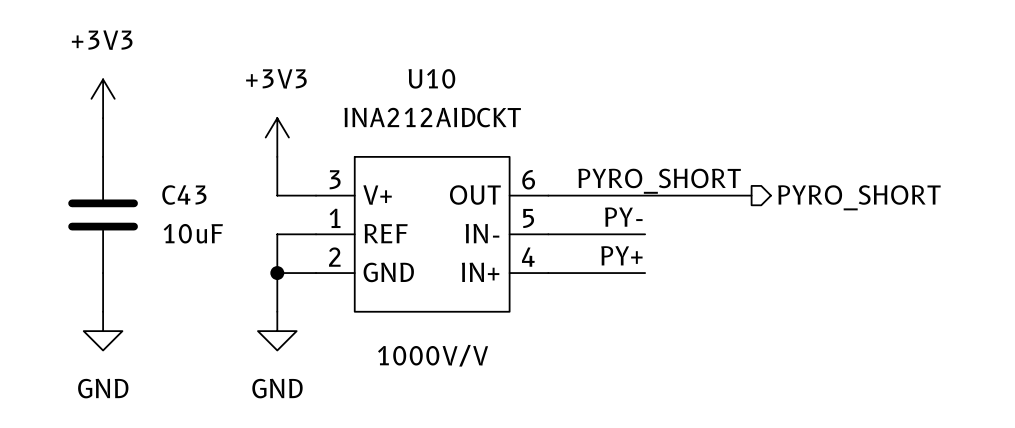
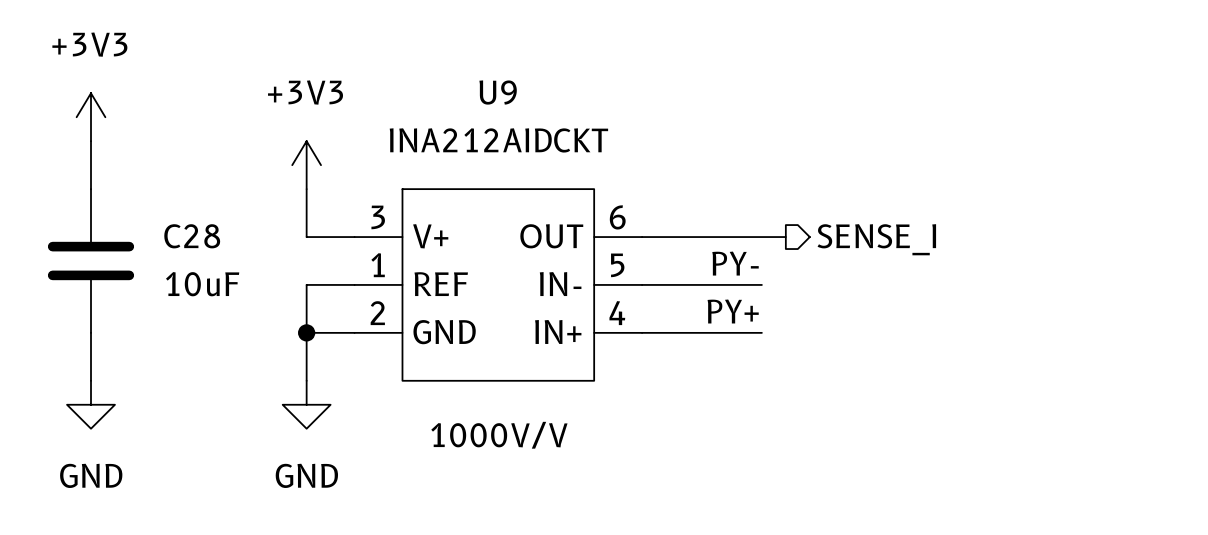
U10 name: U10 (431, 78) -> U9 (498, 92)
label: PYRO_SHORT (659, 181) -> none
C43 name: C43 (184, 194) -> C28 (192, 236)
wire: (664, 195) (751, 195) -> none
hierarchical label: none -> SENSE_I (876, 239)
hierarchical label: PYRO_SHORT (859, 197) -> none

